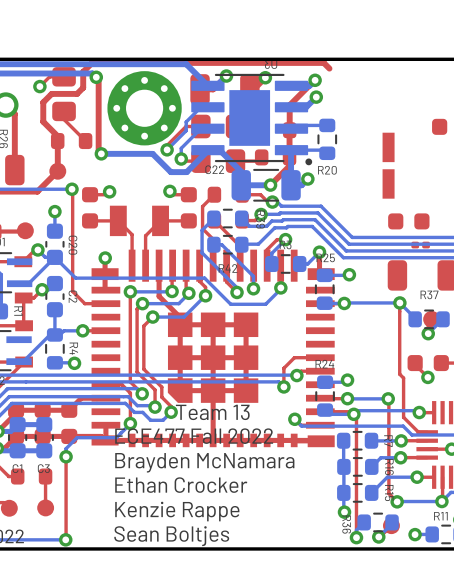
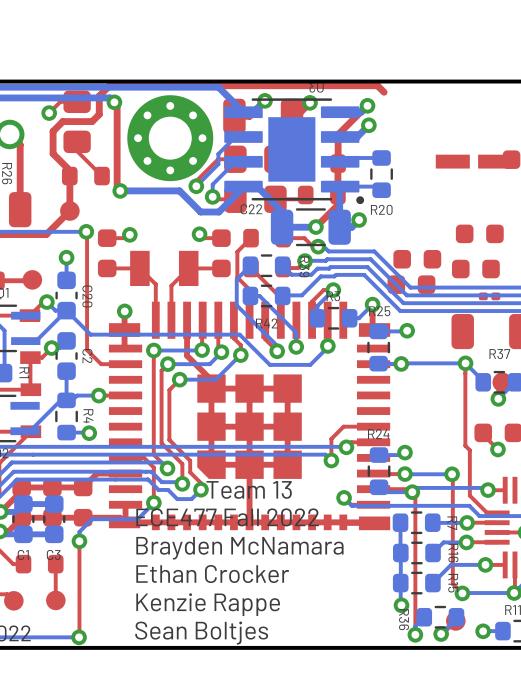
part rotation: 0° (388, 165) -> 90° clockwise (473, 161)
part position: (388, 165) -> (473, 161)
part: none -> (479, 233)
part: none -> (417, 259)
part: none -> (411, 284)

